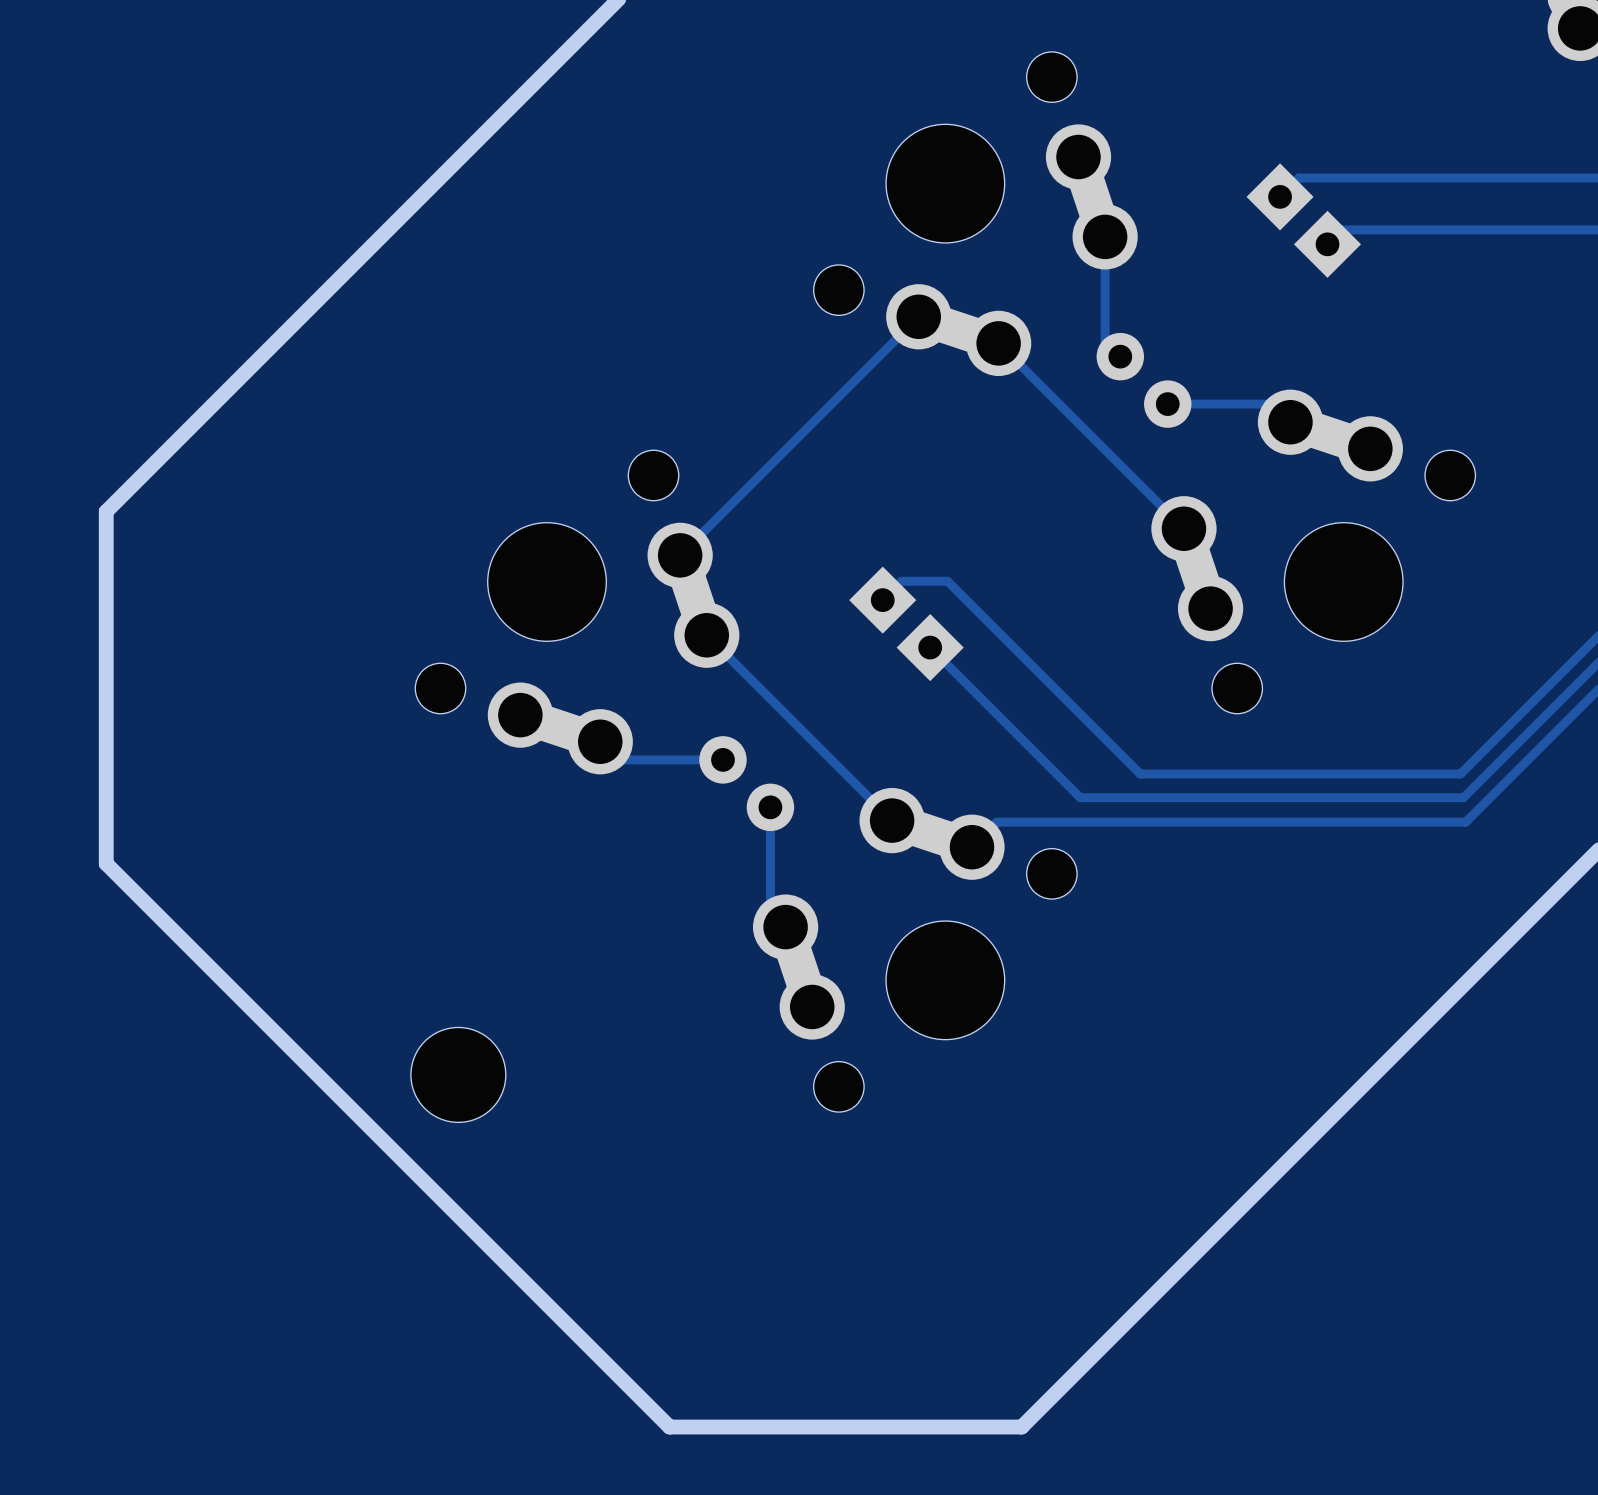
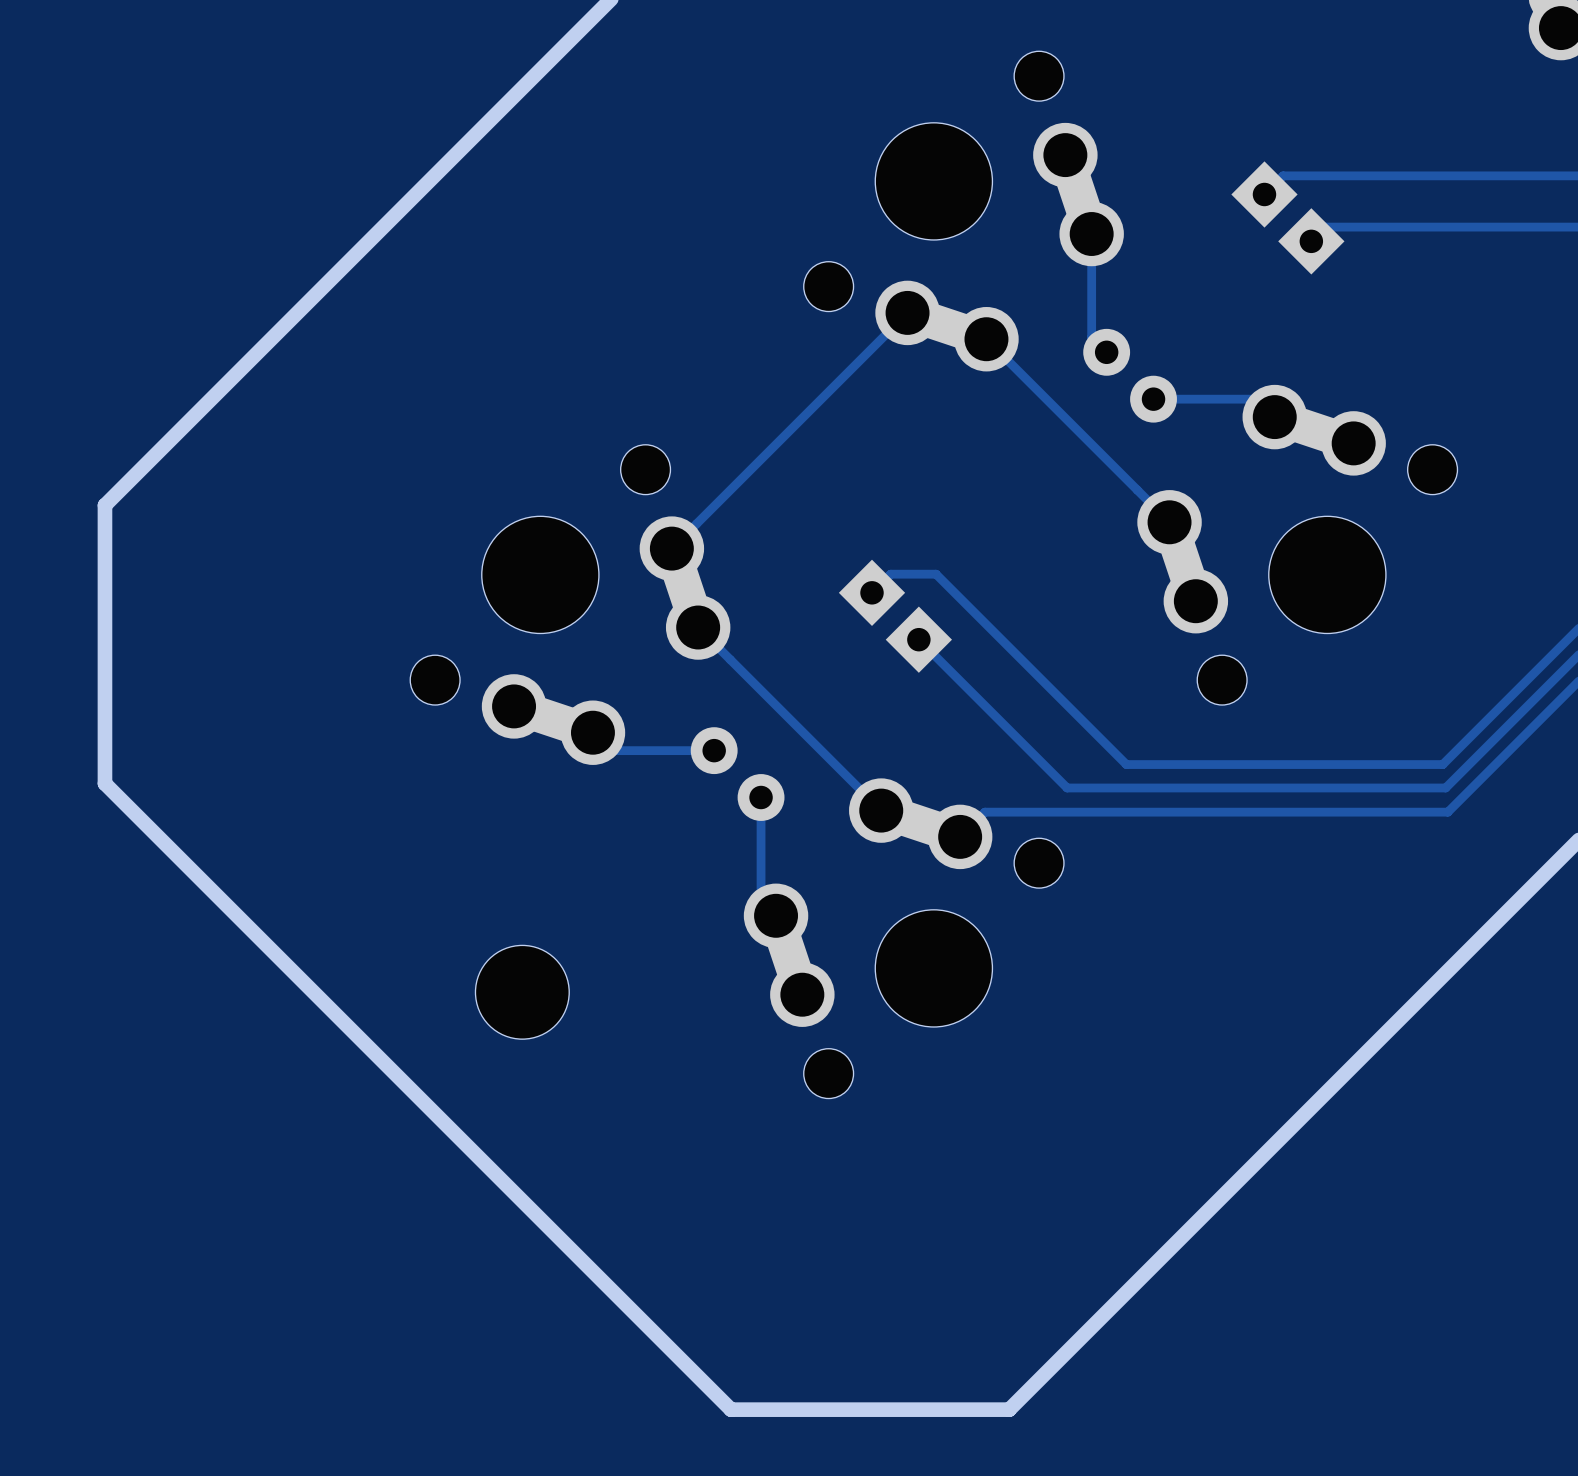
board edge: (106, 793) (106, 863) (669, 1427) (740, 1427) -> (104, 783) (731, 1409)
part position: (458, 1074) -> (522, 992)

